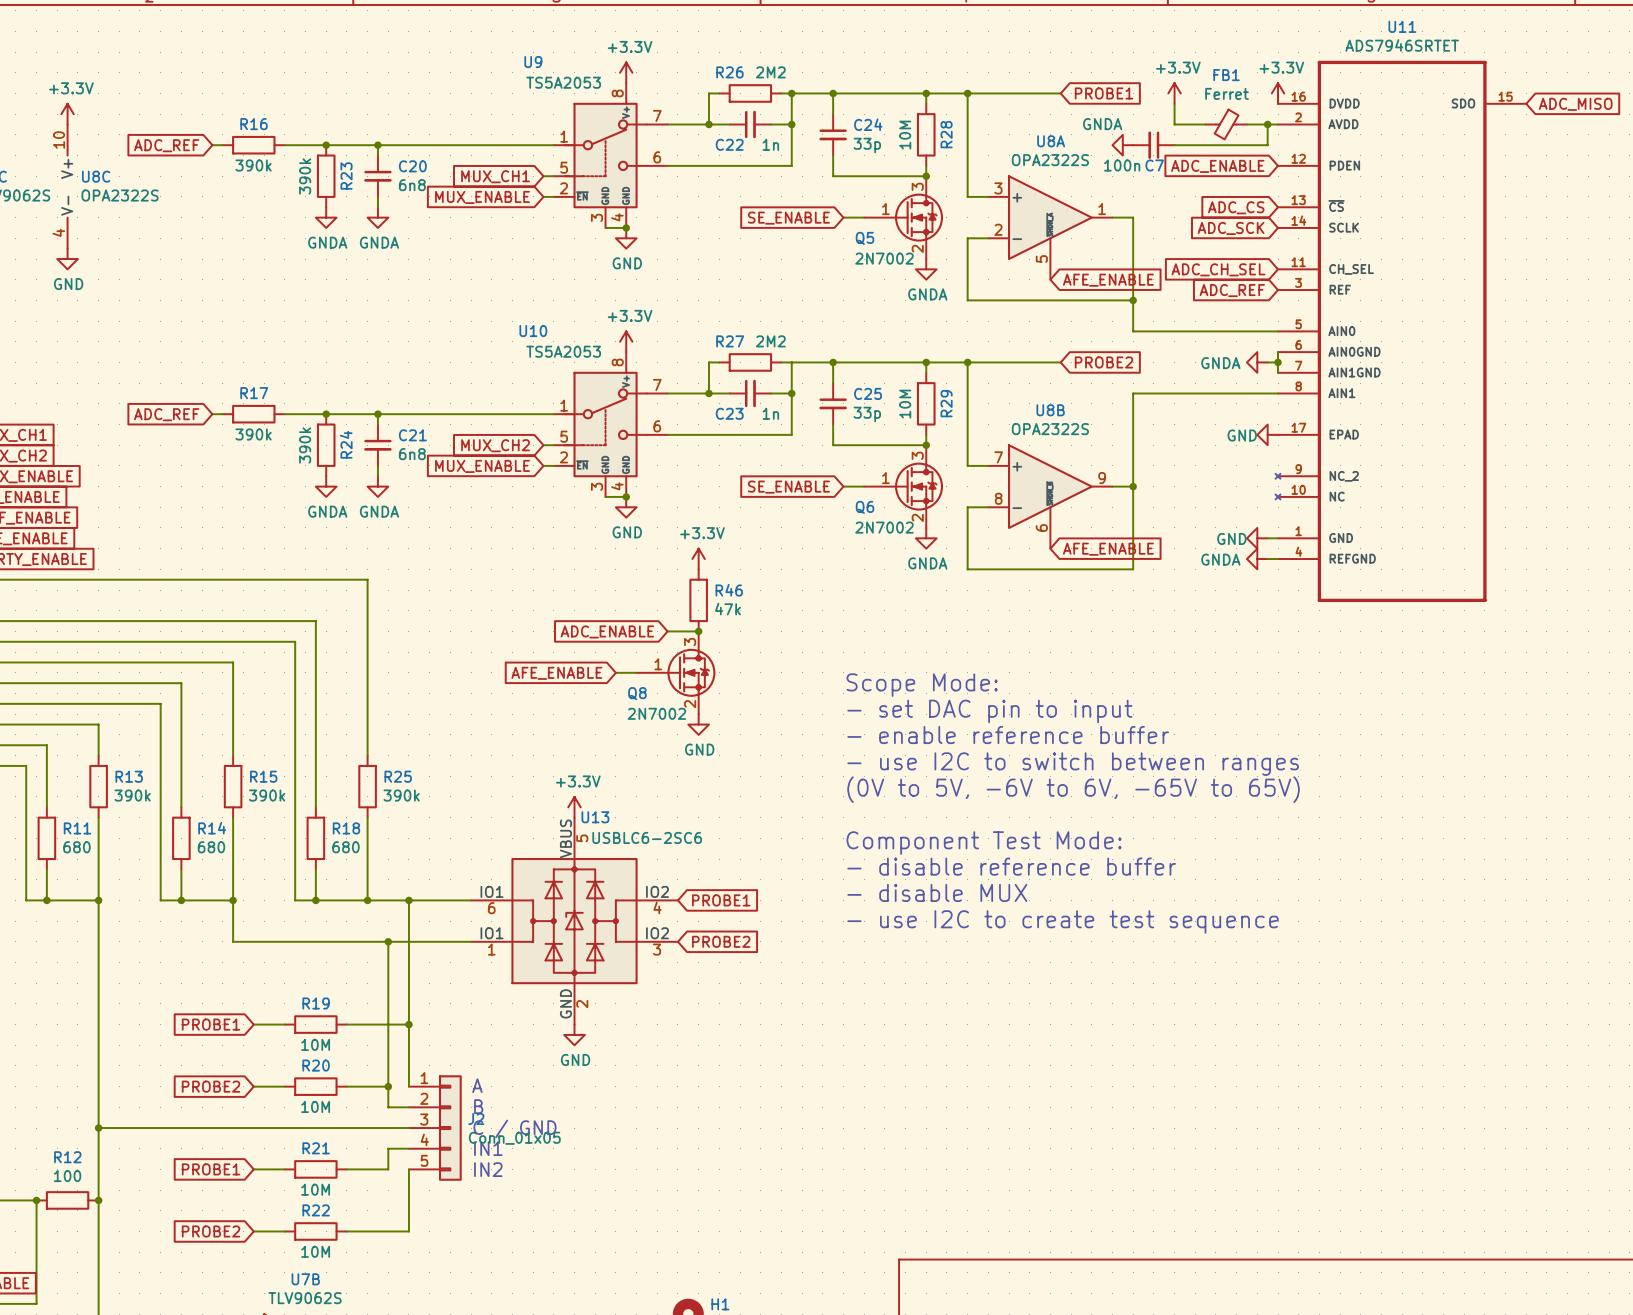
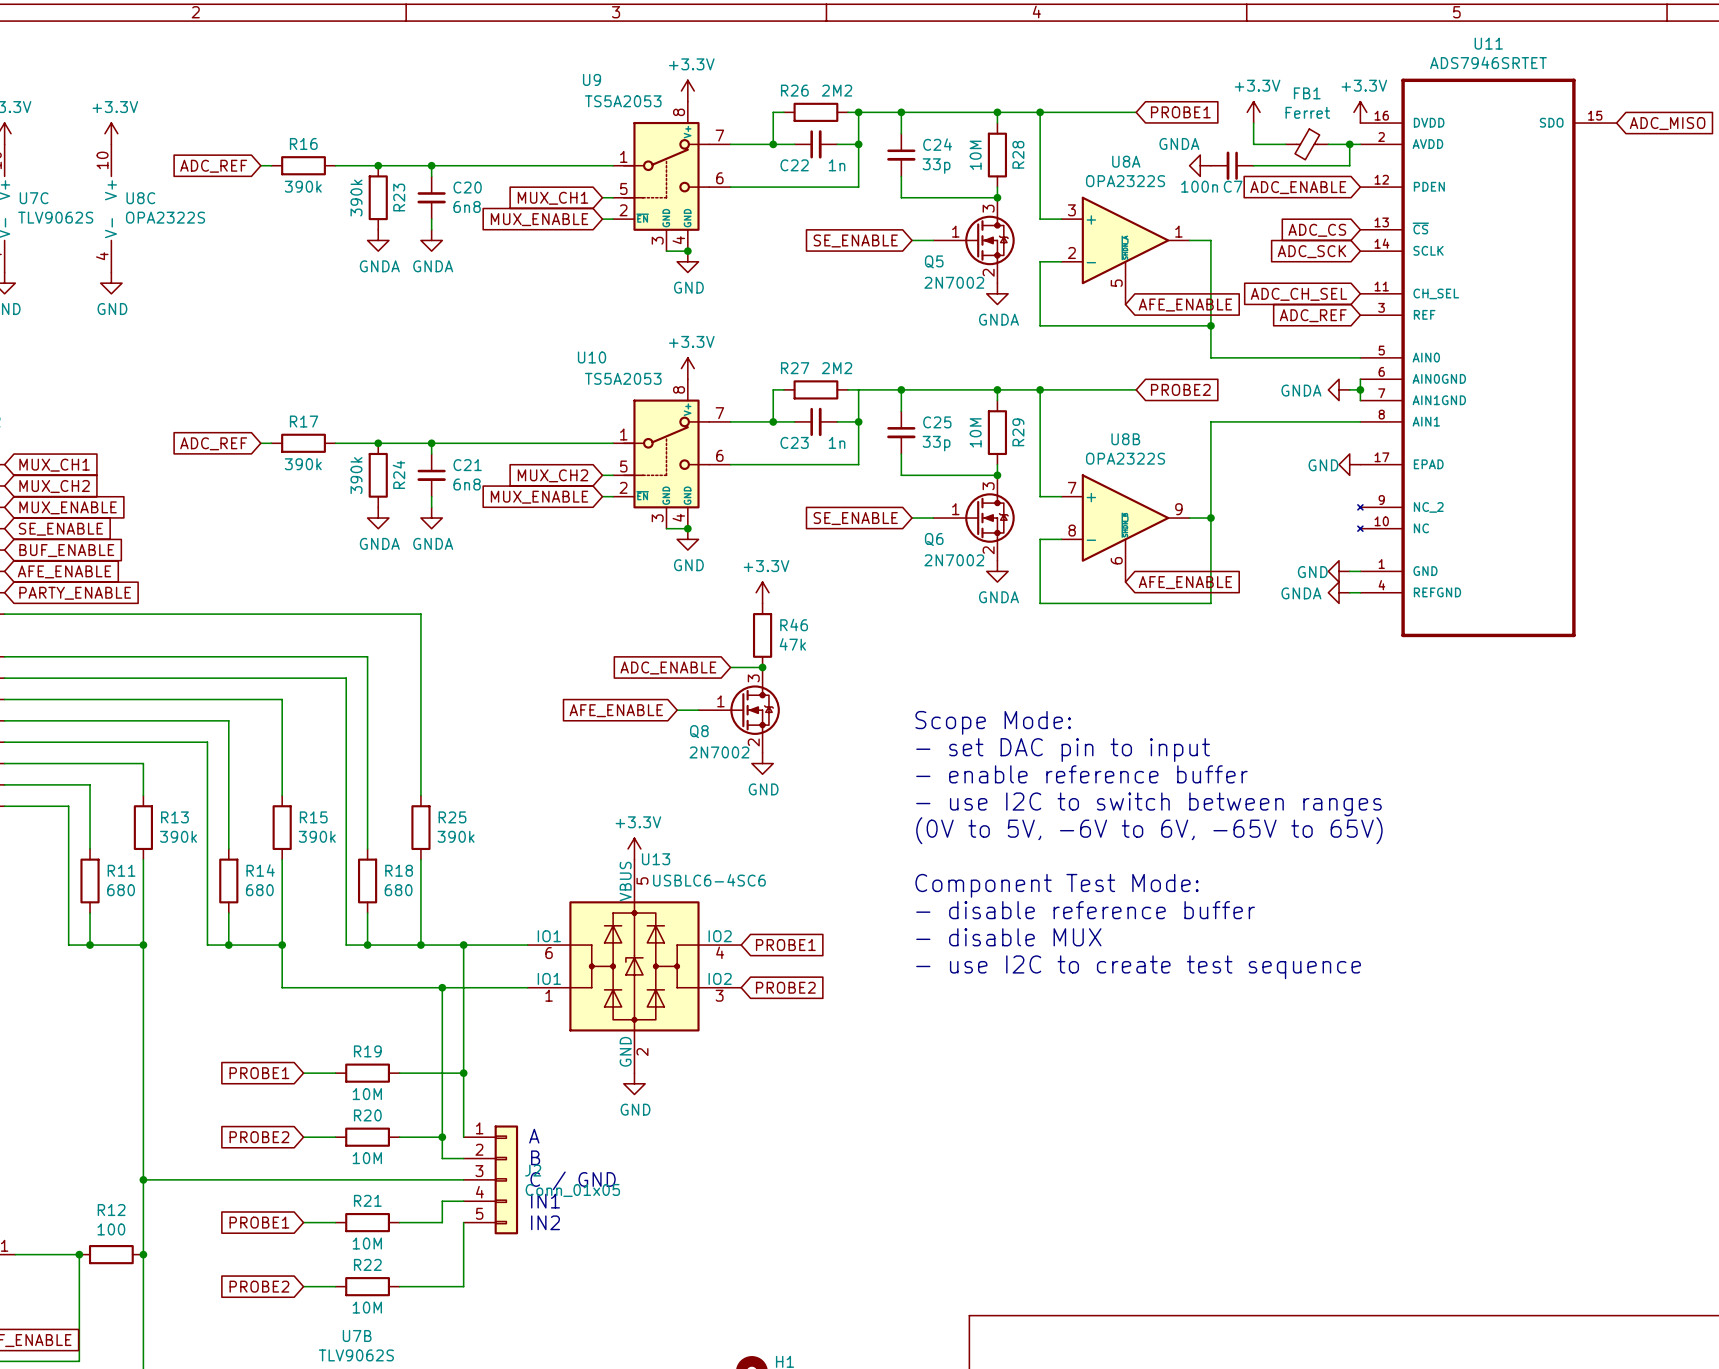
U13 value: USBLC6-2SC6 (647, 837) -> USBLC6-4SC6 (709, 880)

